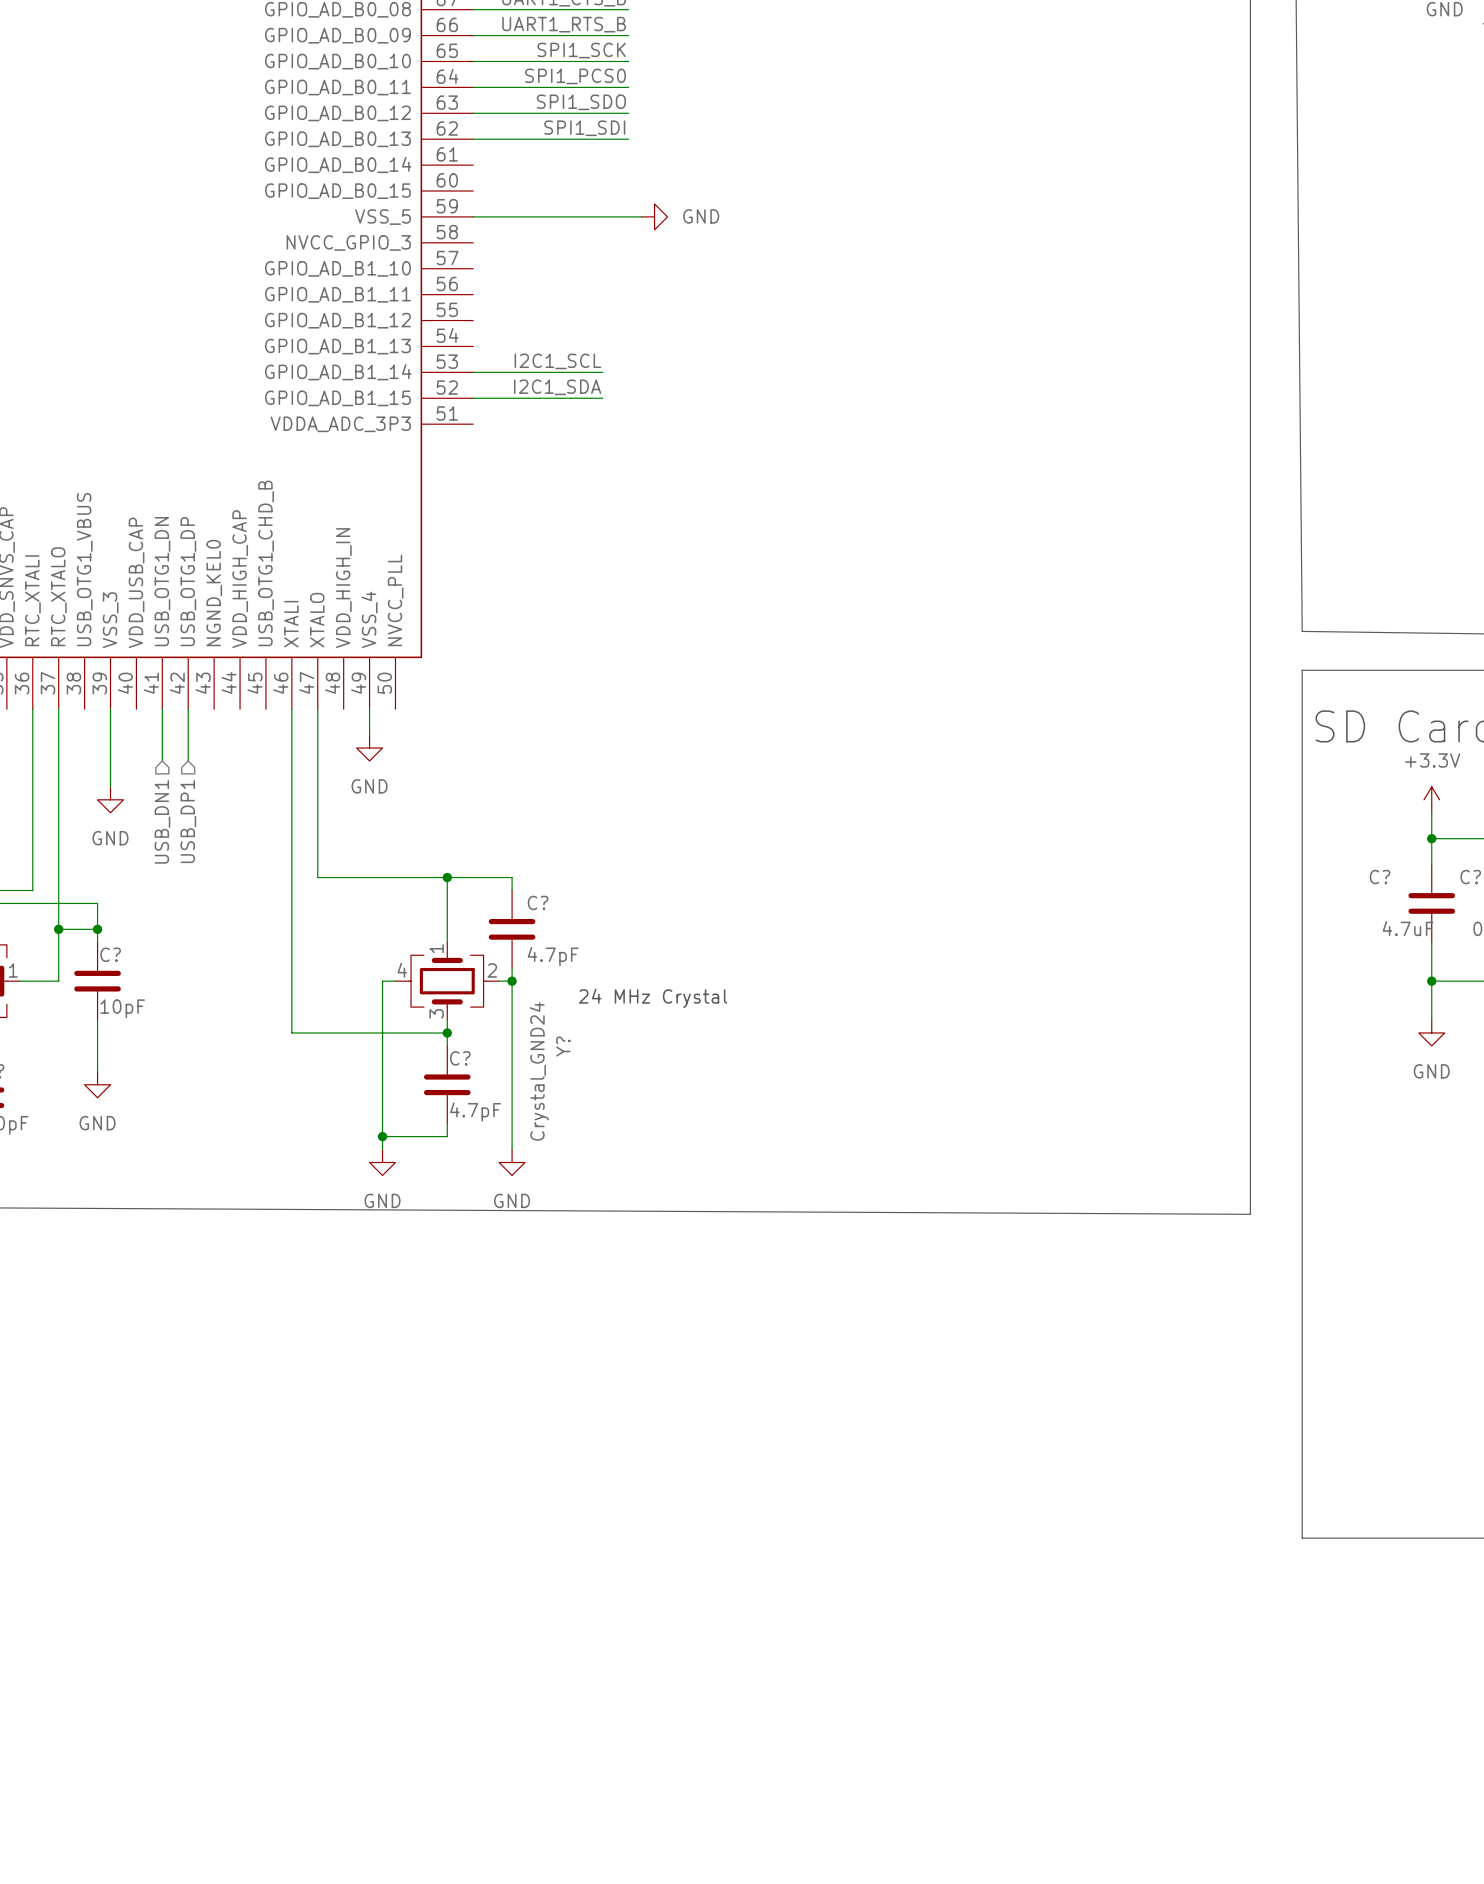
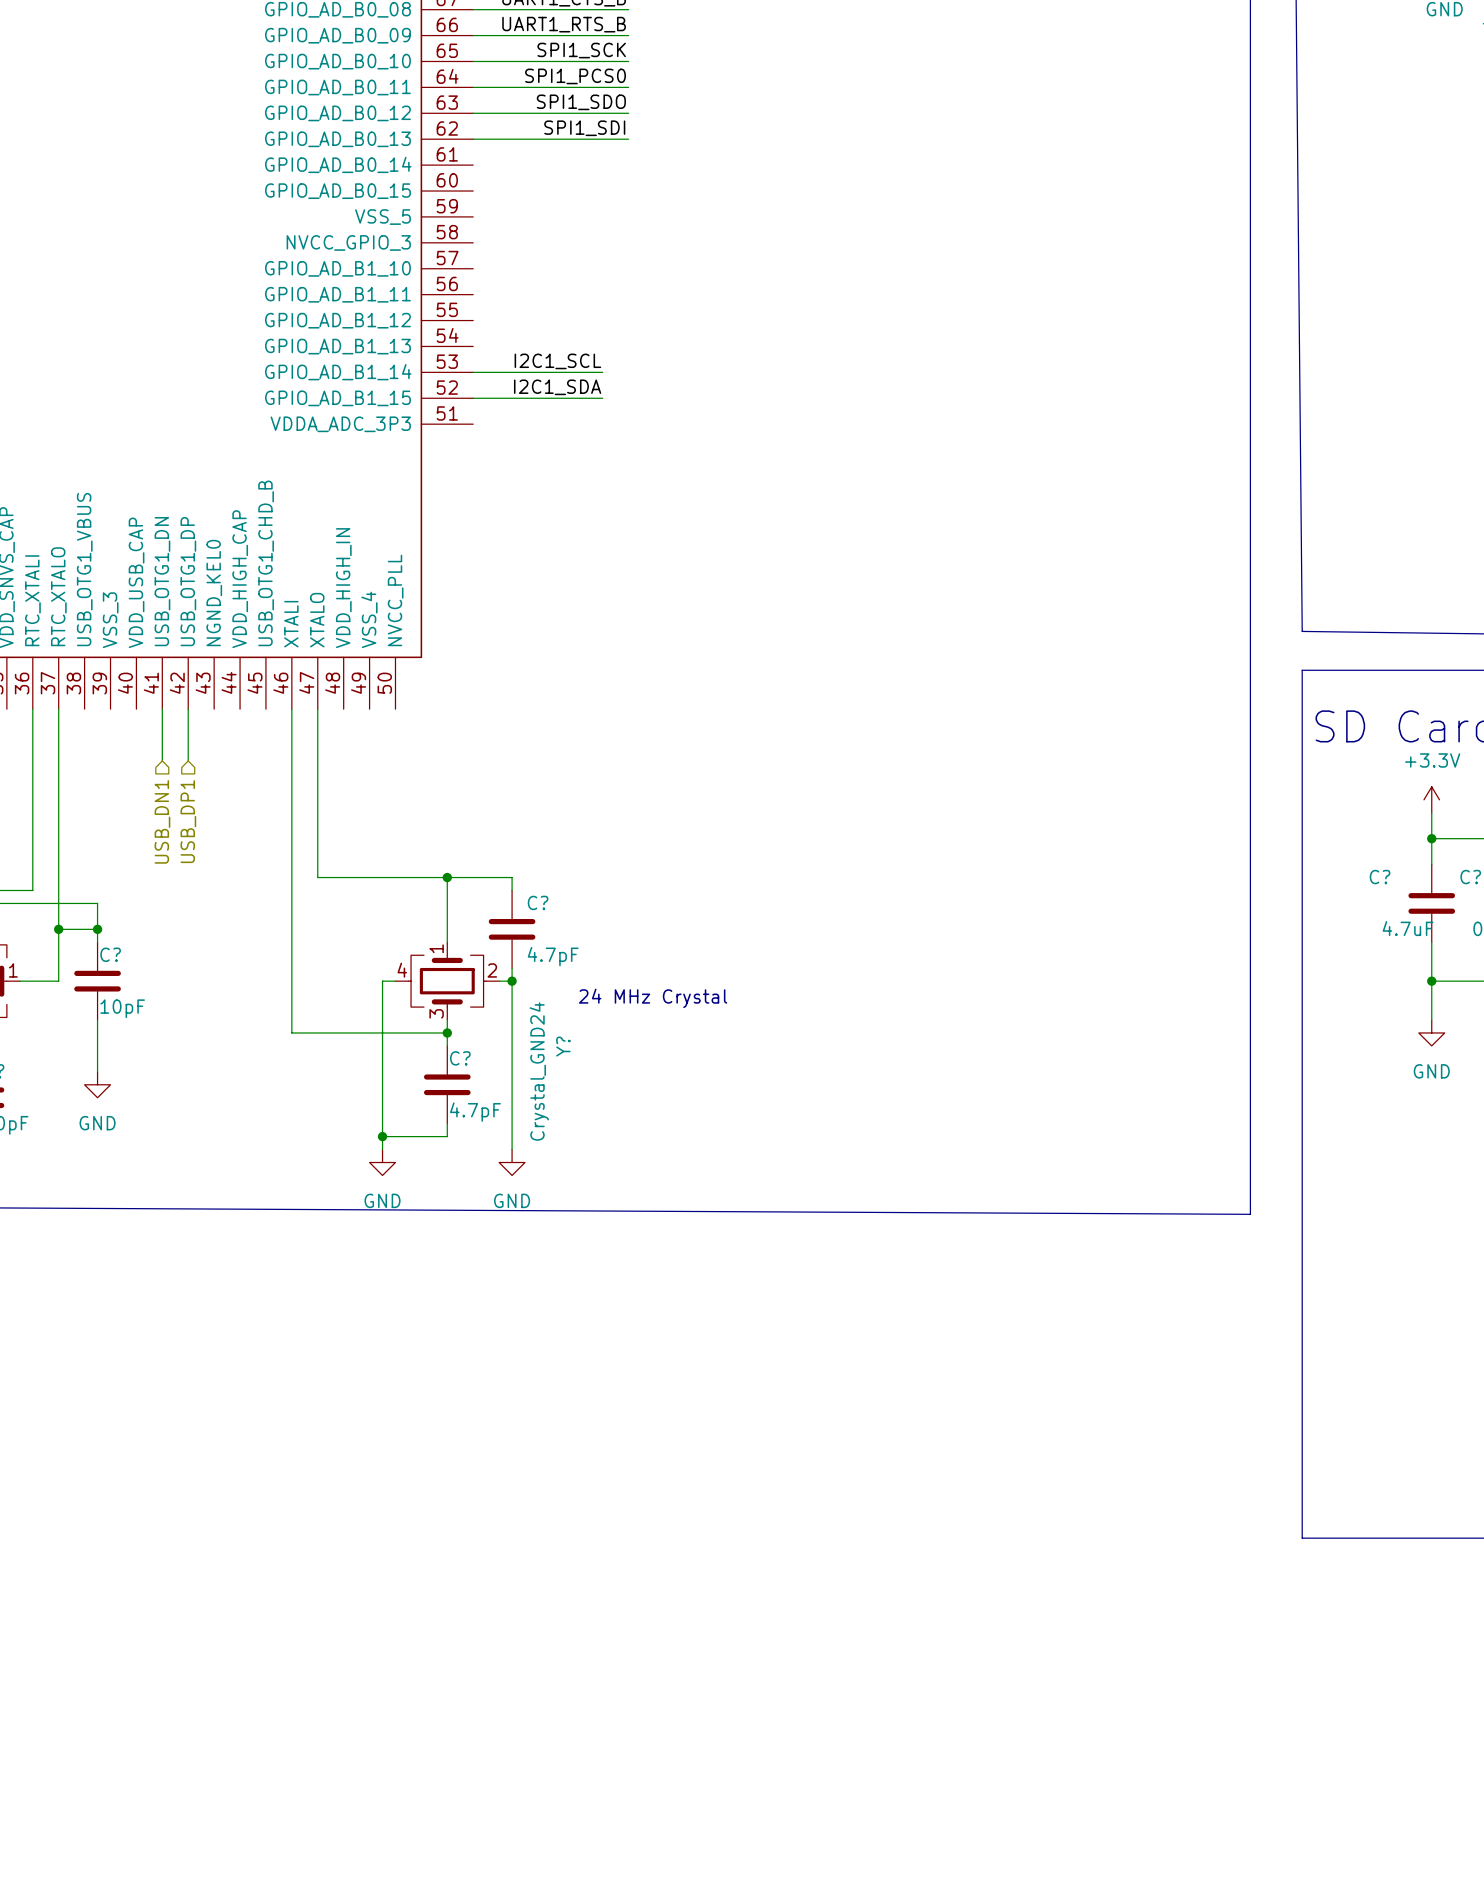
wire: (473, 216) (641, 216) -> none
power symbol: GND (654, 216) -> none
wire: (110, 709) (110, 786) -> none
wire: (369, 709) (369, 735) -> none
power symbol: GND (369, 748) -> none
power symbol: GND (110, 799) -> none

